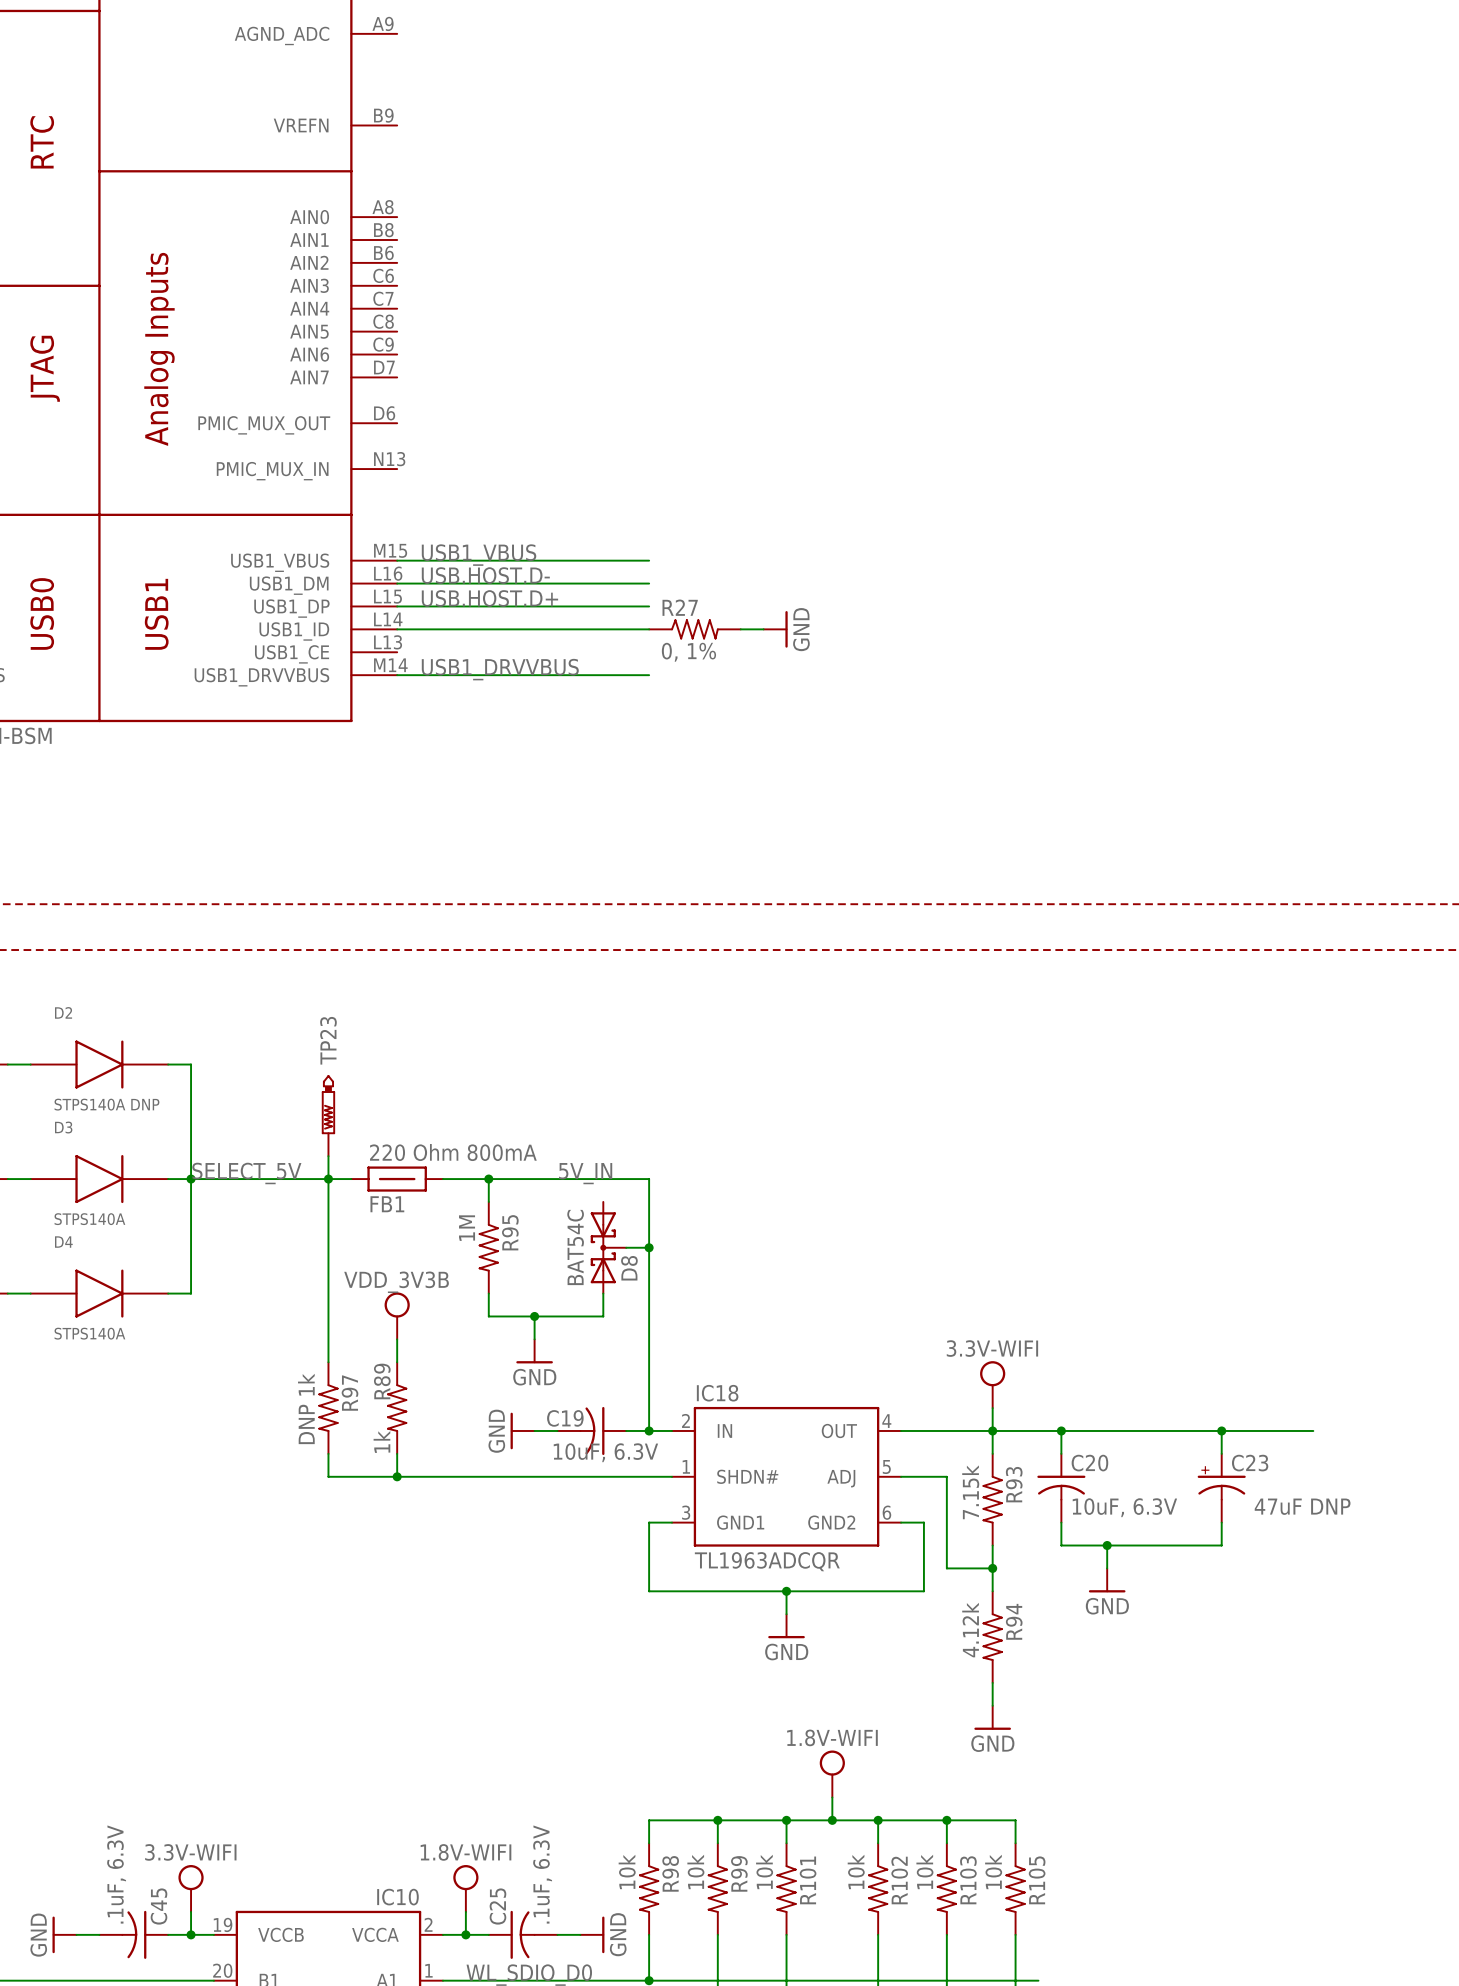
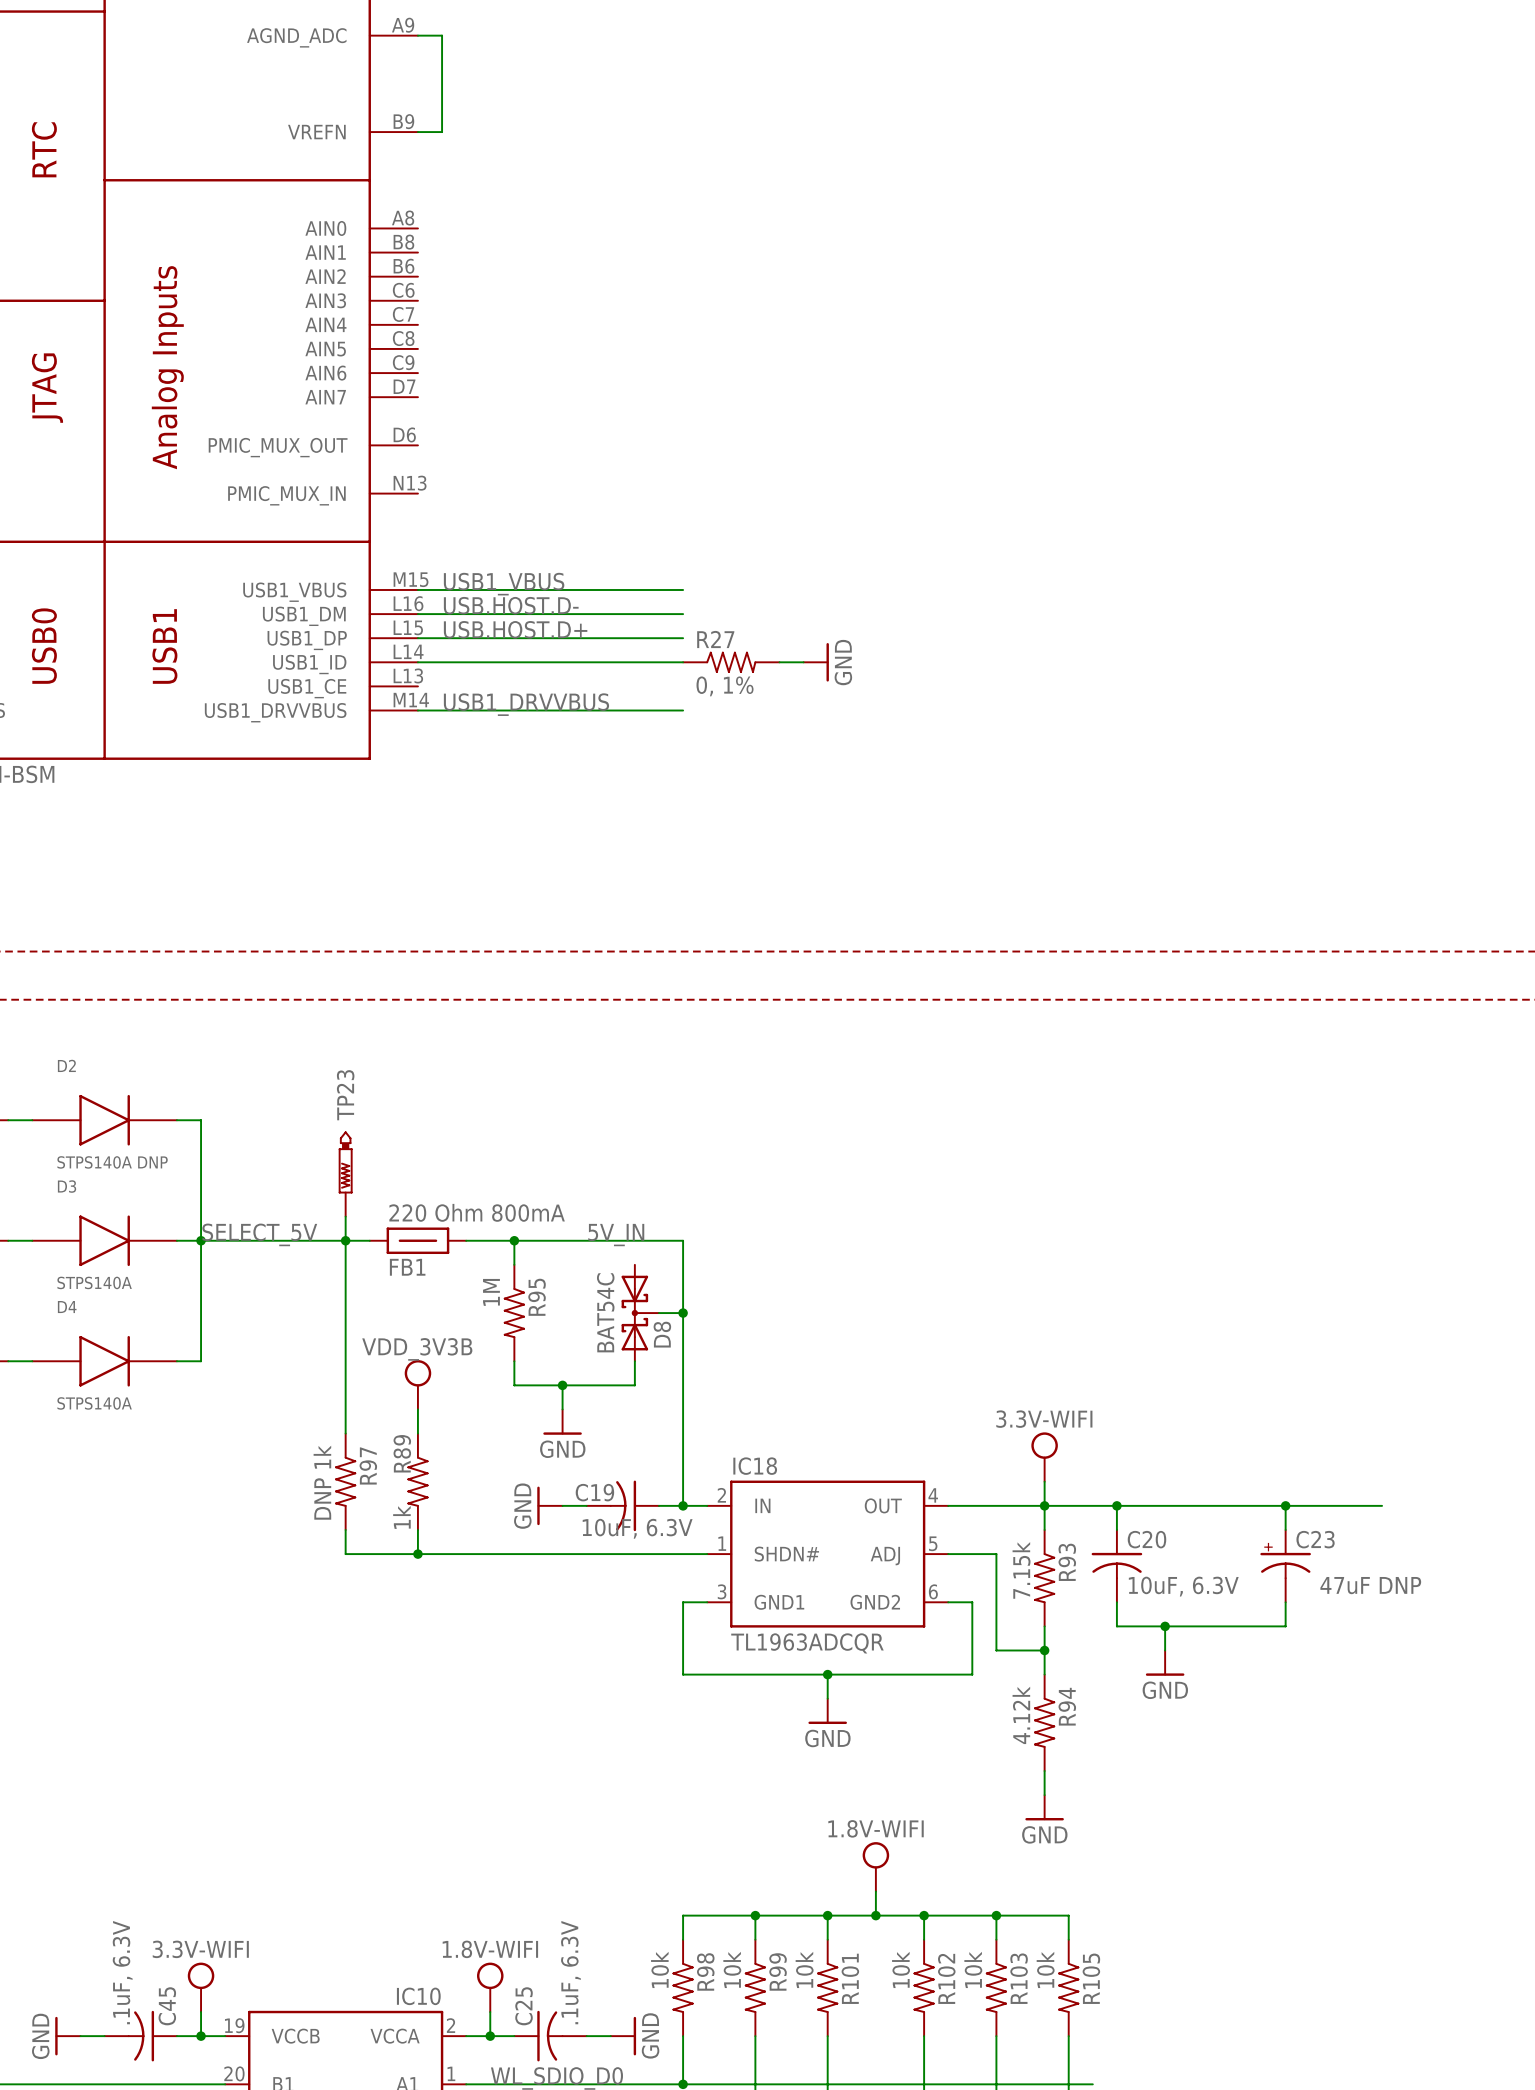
wire: none -> (417, 35) (442, 35) (442, 132) (417, 132)

